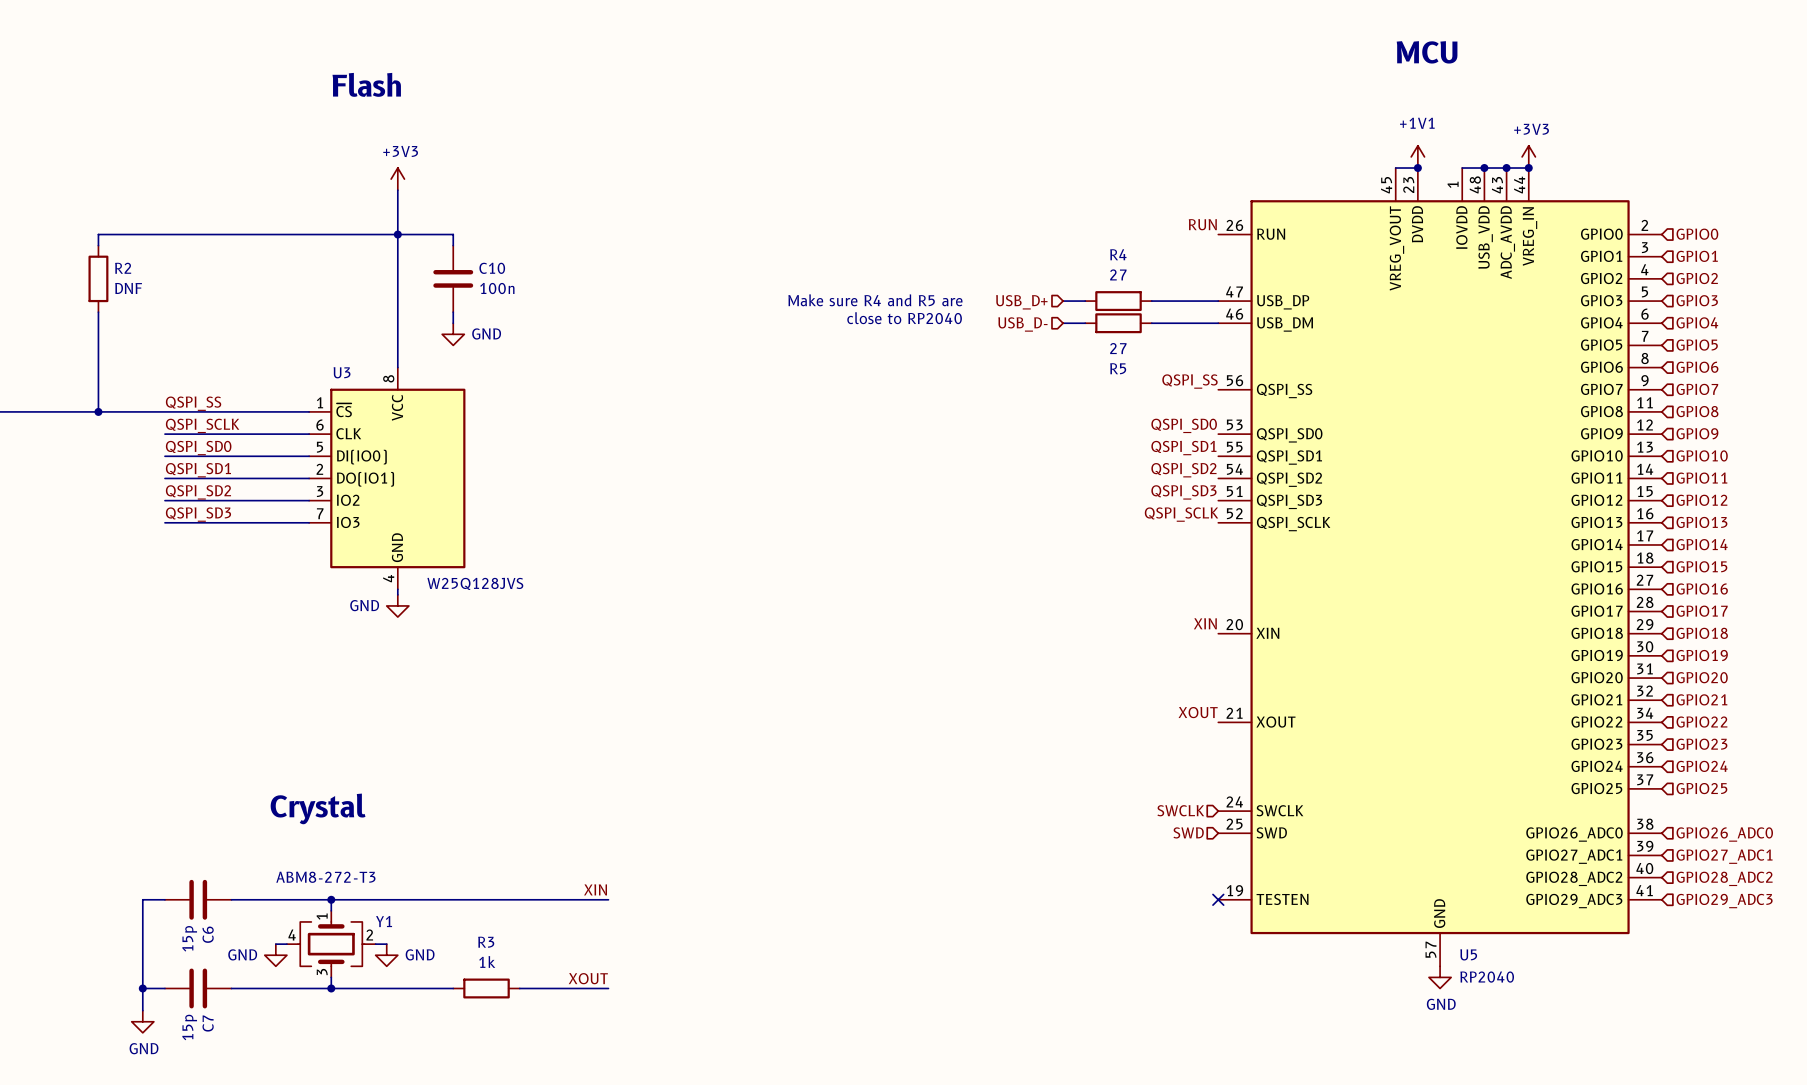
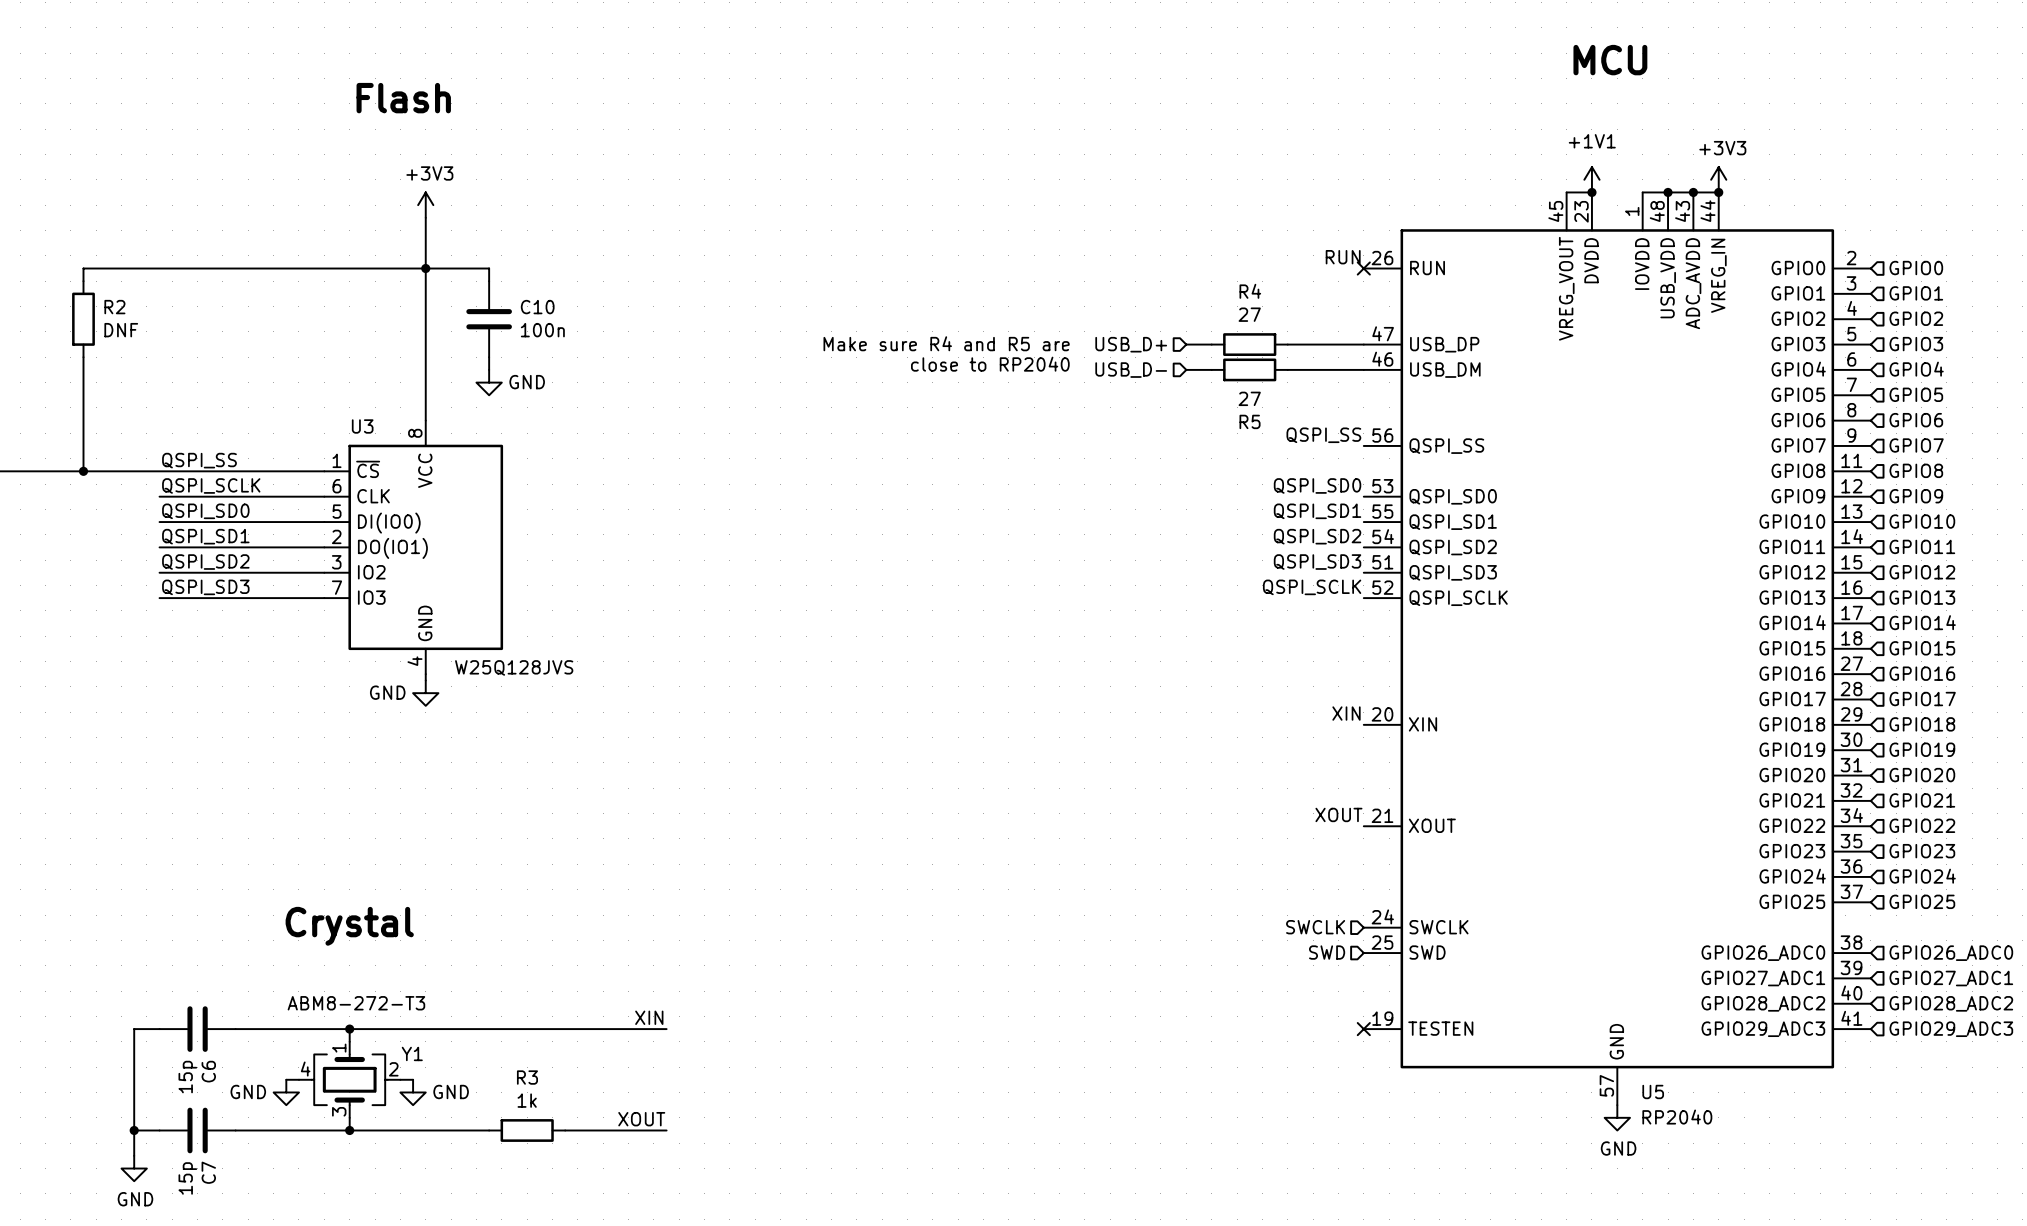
no-connect mark: none -> (1363, 268)

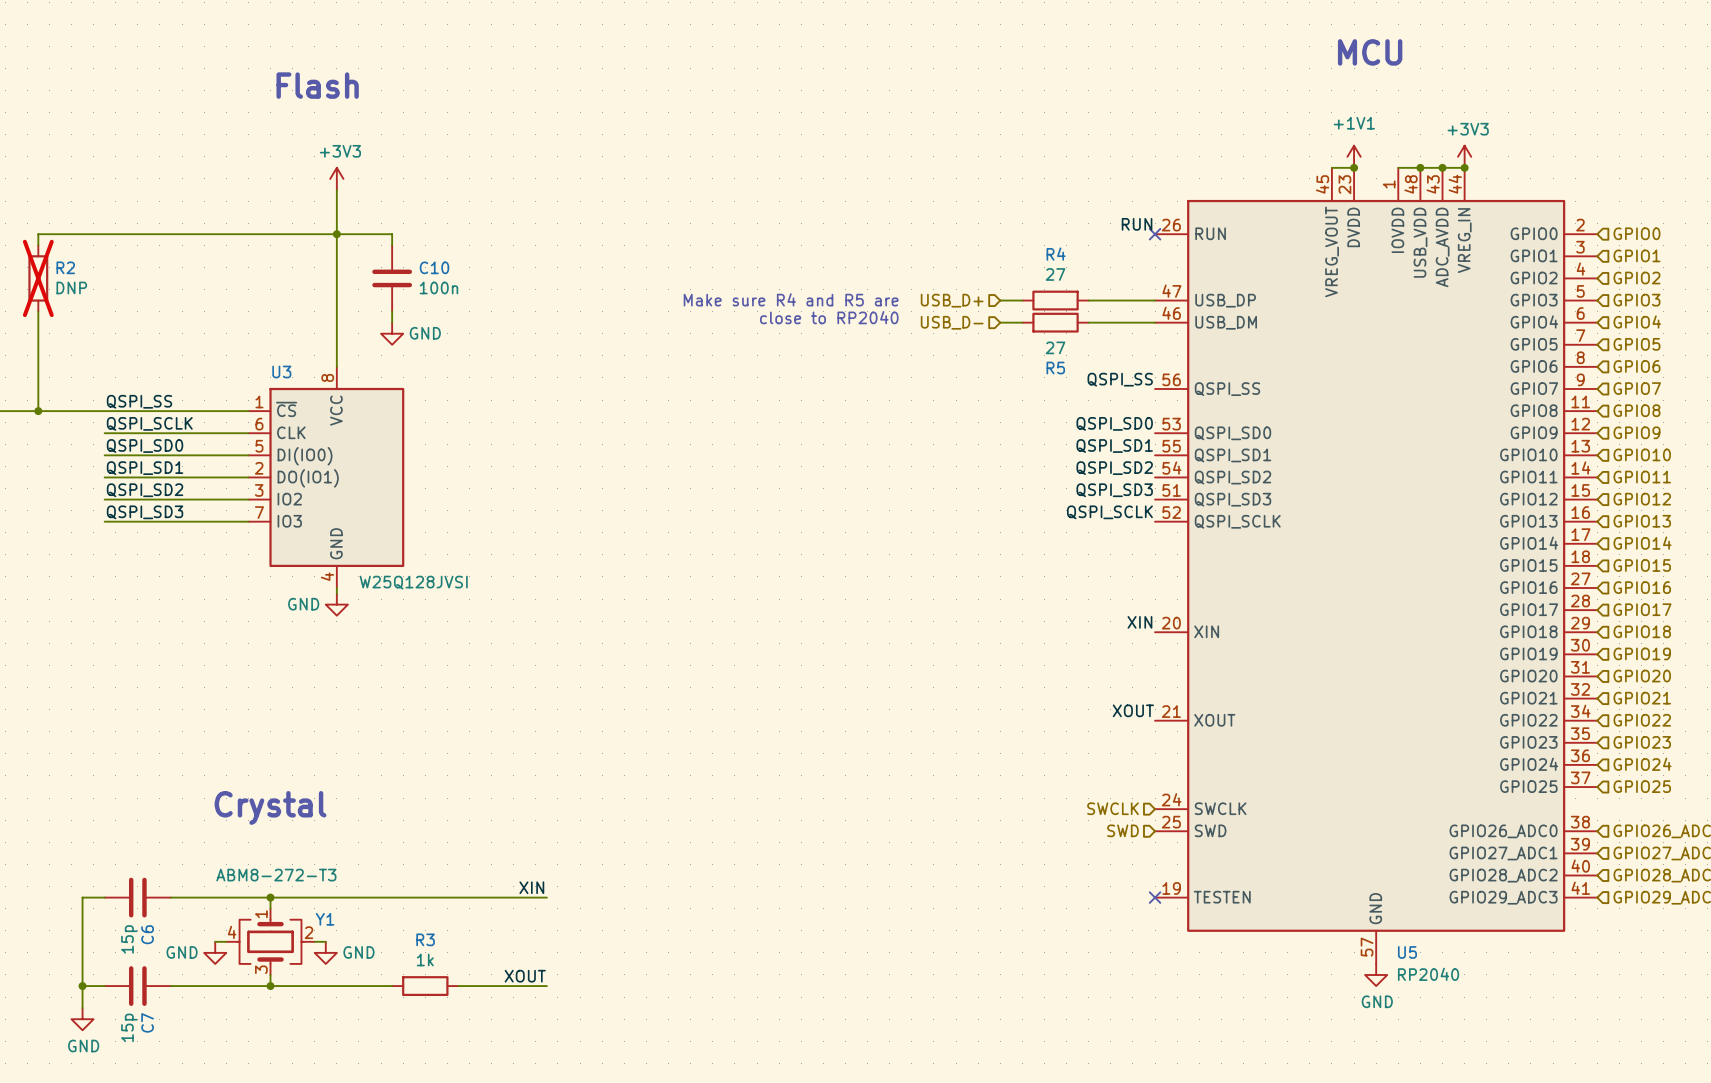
R2 do-not-place cross: none -> (38, 278)
R2 value: DNF (121, 330) -> DNP (71, 287)
U3 value: W25Q128JVS (514, 667) -> W25Q128JVSI (413, 582)

